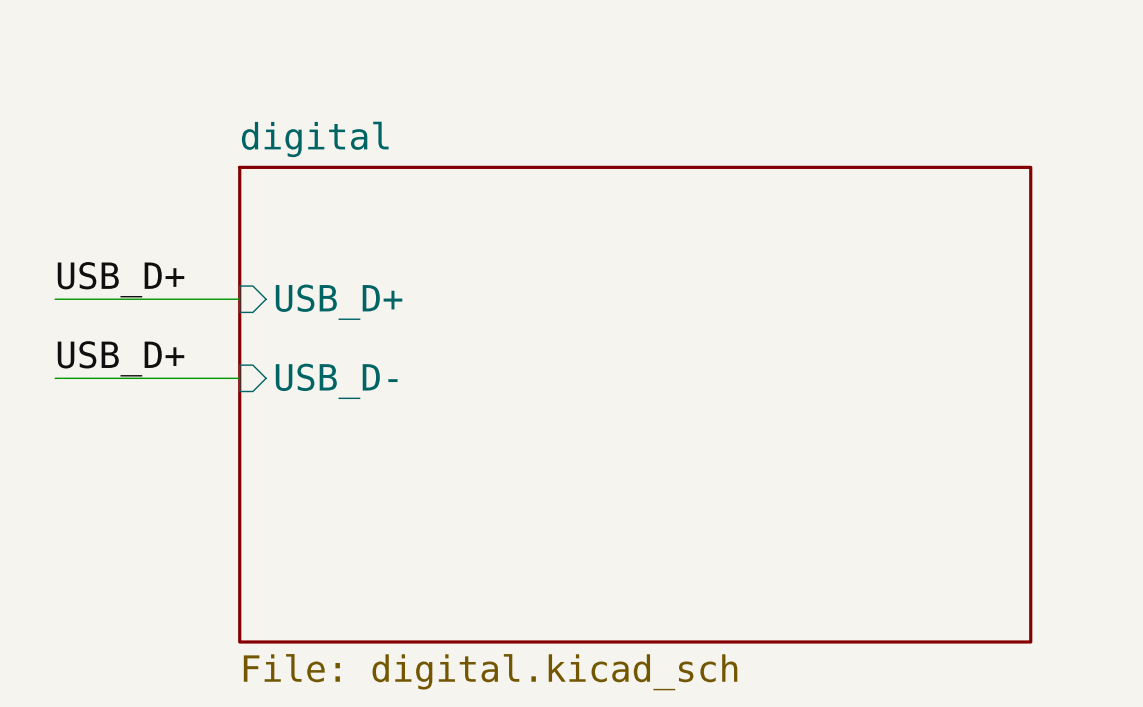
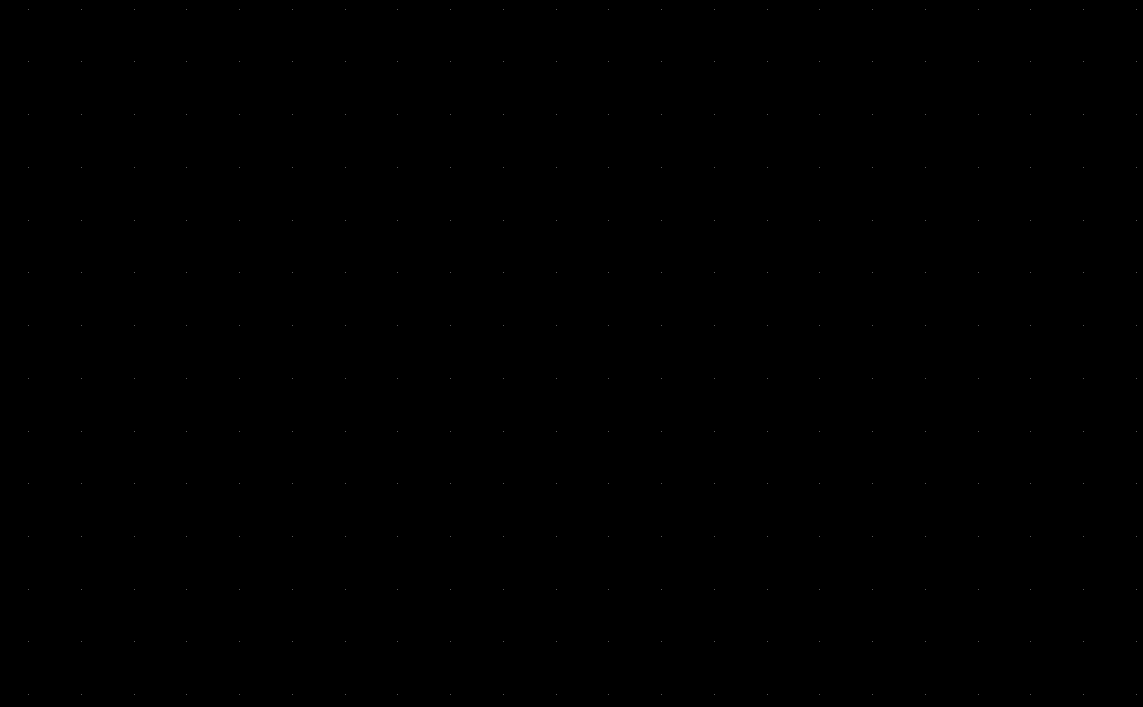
label: USB_D+ (120, 279) -> none
wire: (55, 299) (239, 299) -> none
sheet pin: USB_D+ (339, 302) -> none
label: USB_D+ (120, 358) -> none
wire: (55, 378) (239, 378) -> none
sheet pin: USB_D- (336, 381) -> none
sheet digital: File: digital.kicad_sch (635, 404) -> none

